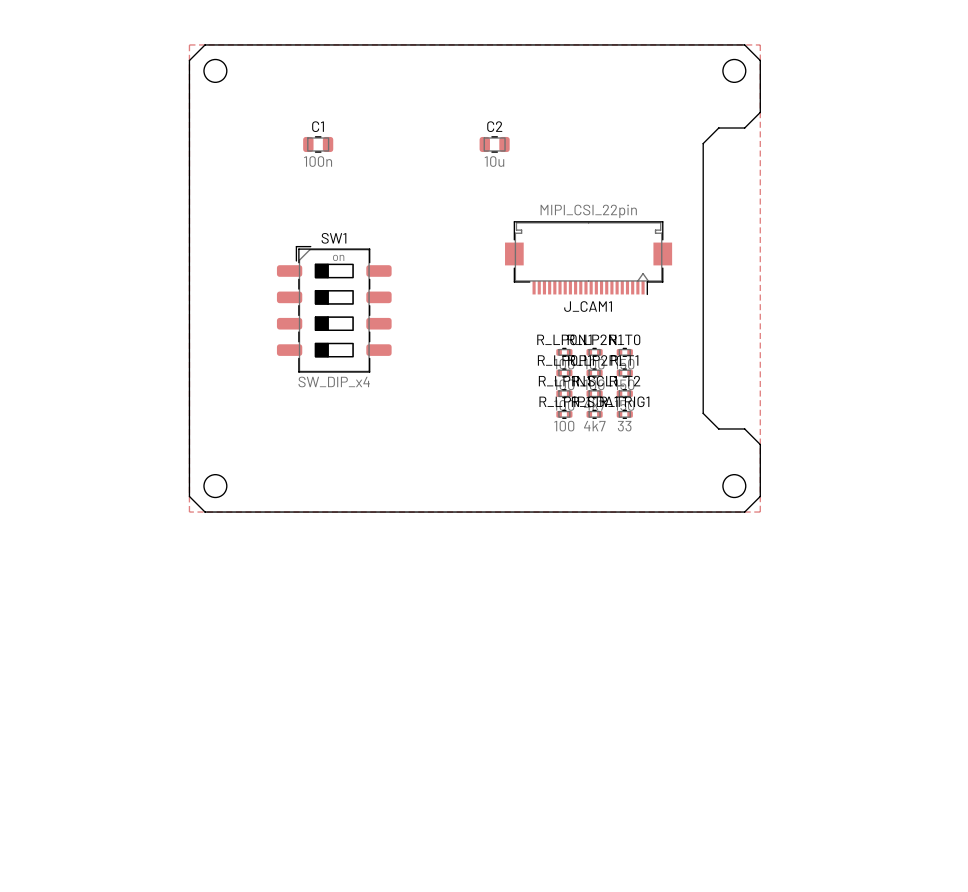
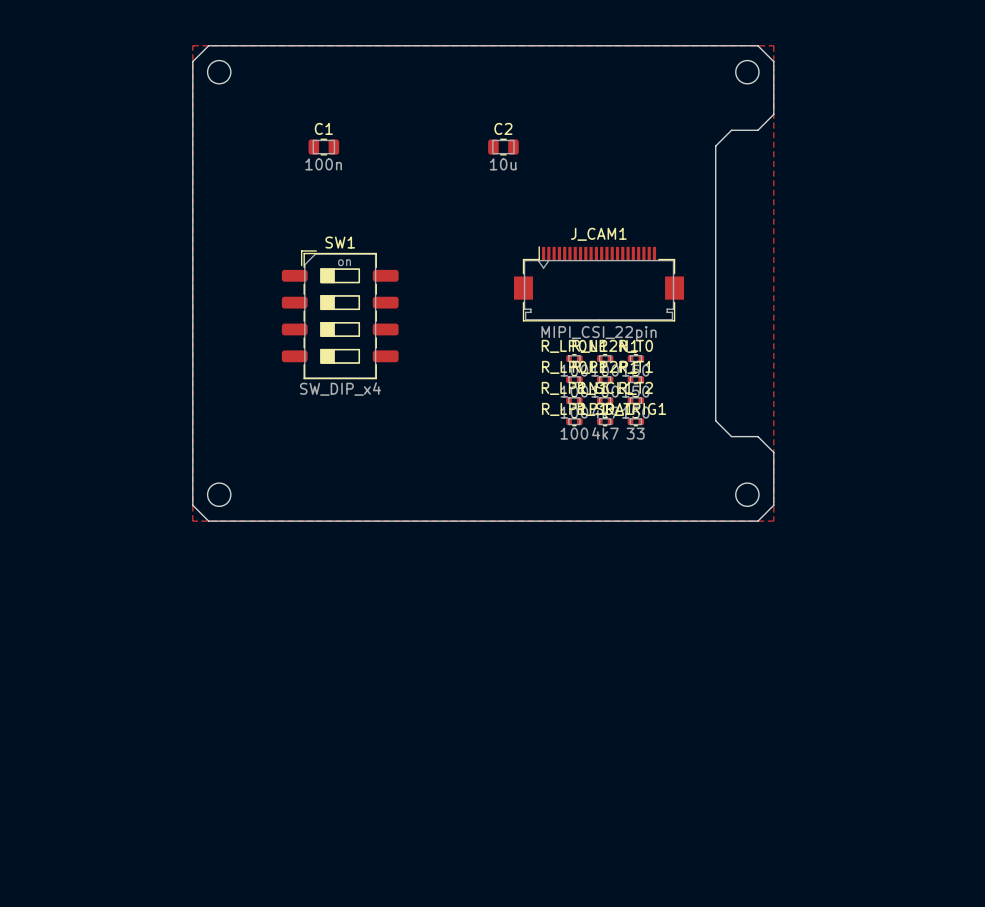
J_CAM1 rotation: 0° (588, 258) -> 180° (599, 283)

